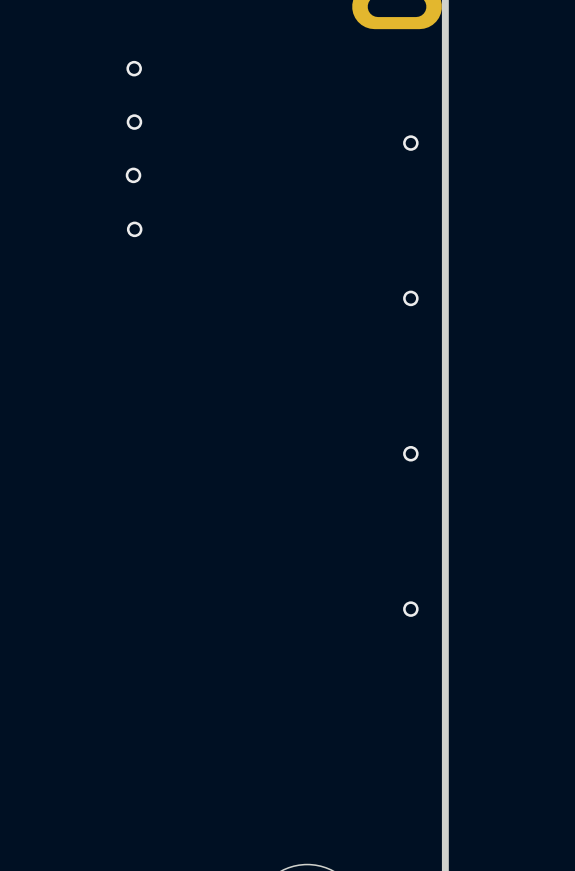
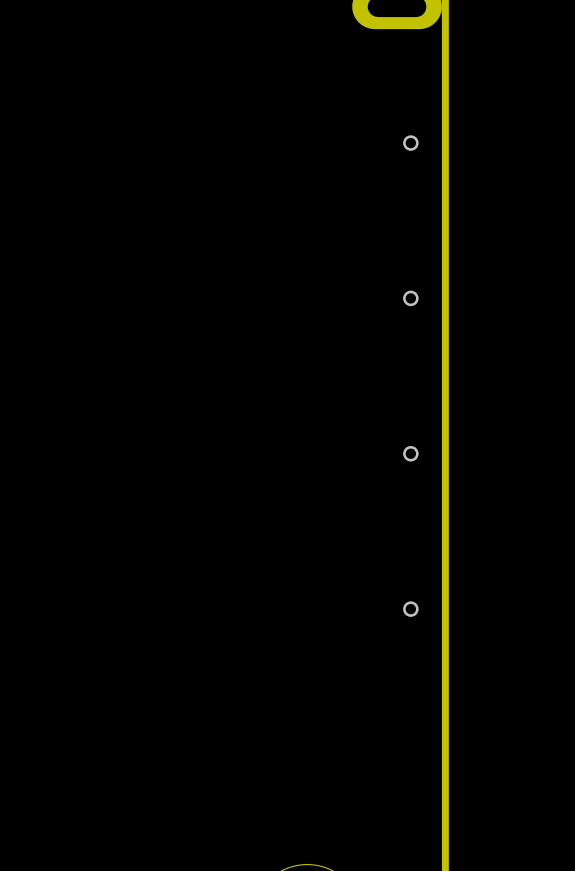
via: (134, 68) -> none
via: (134, 122) -> none
via: (133, 175) -> none
via: (134, 229) -> none

